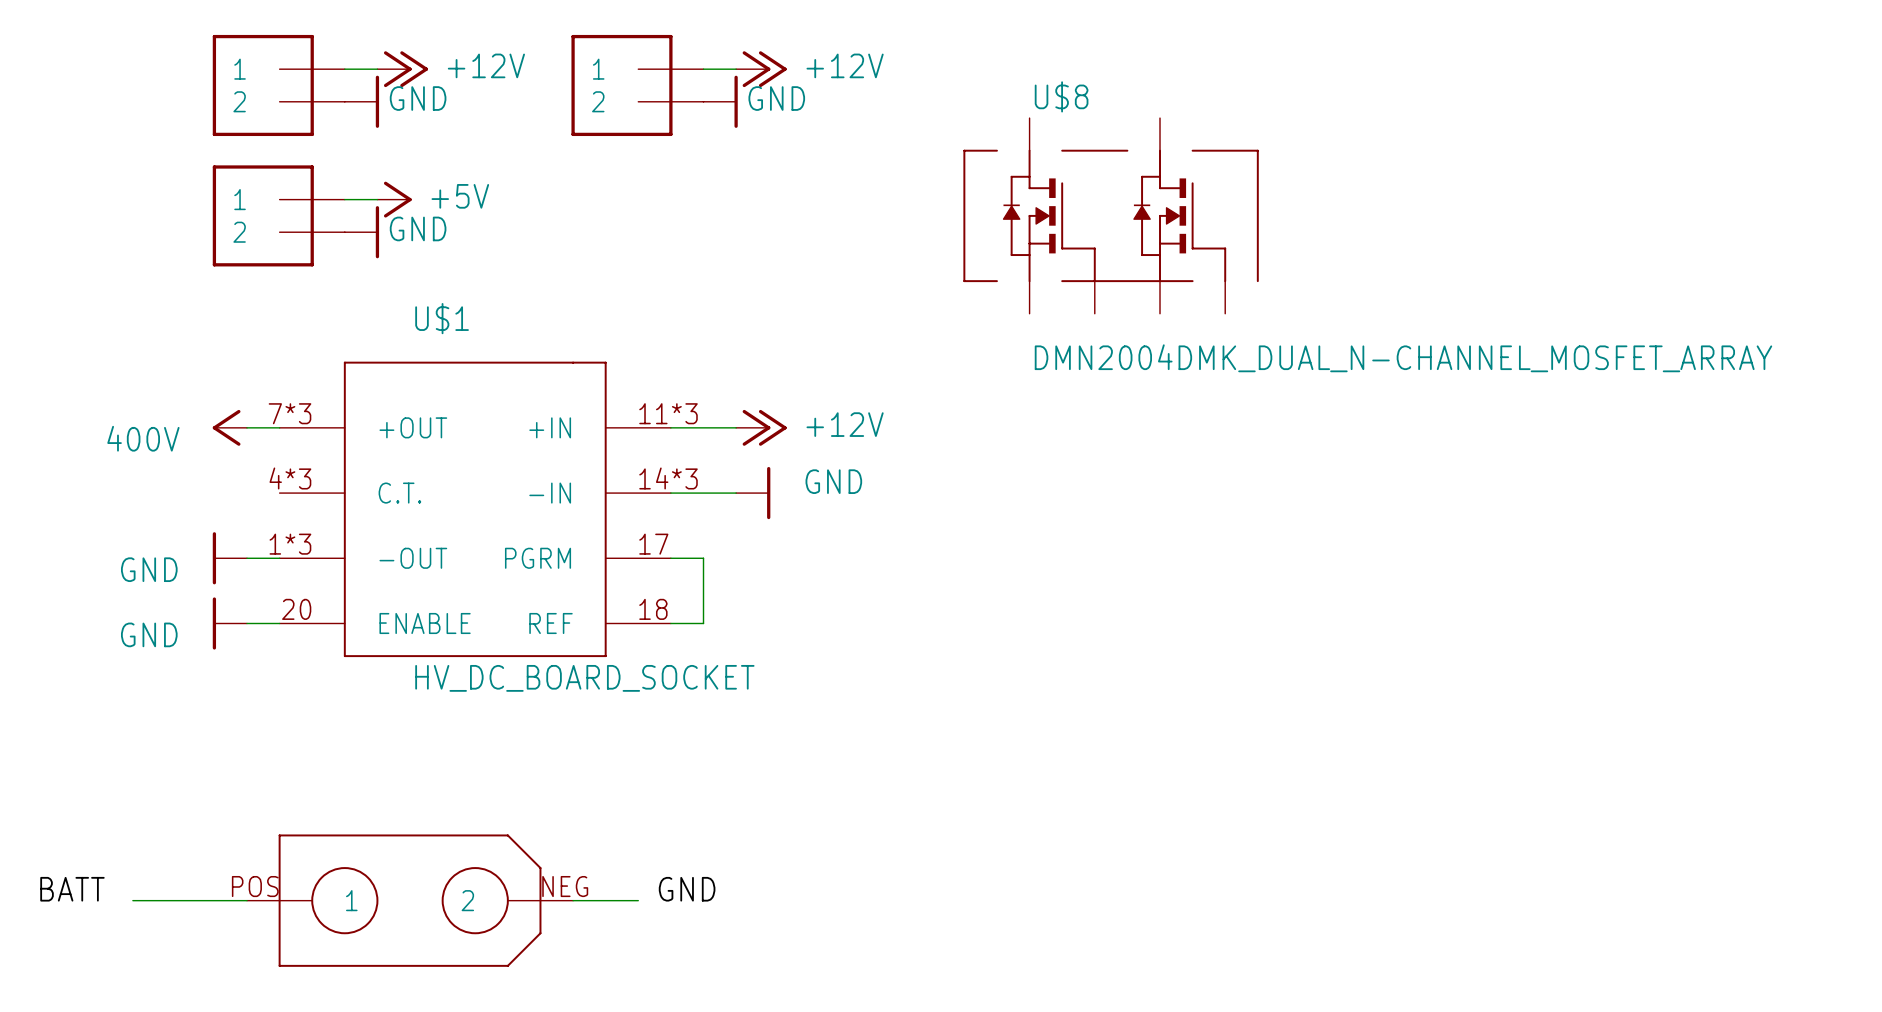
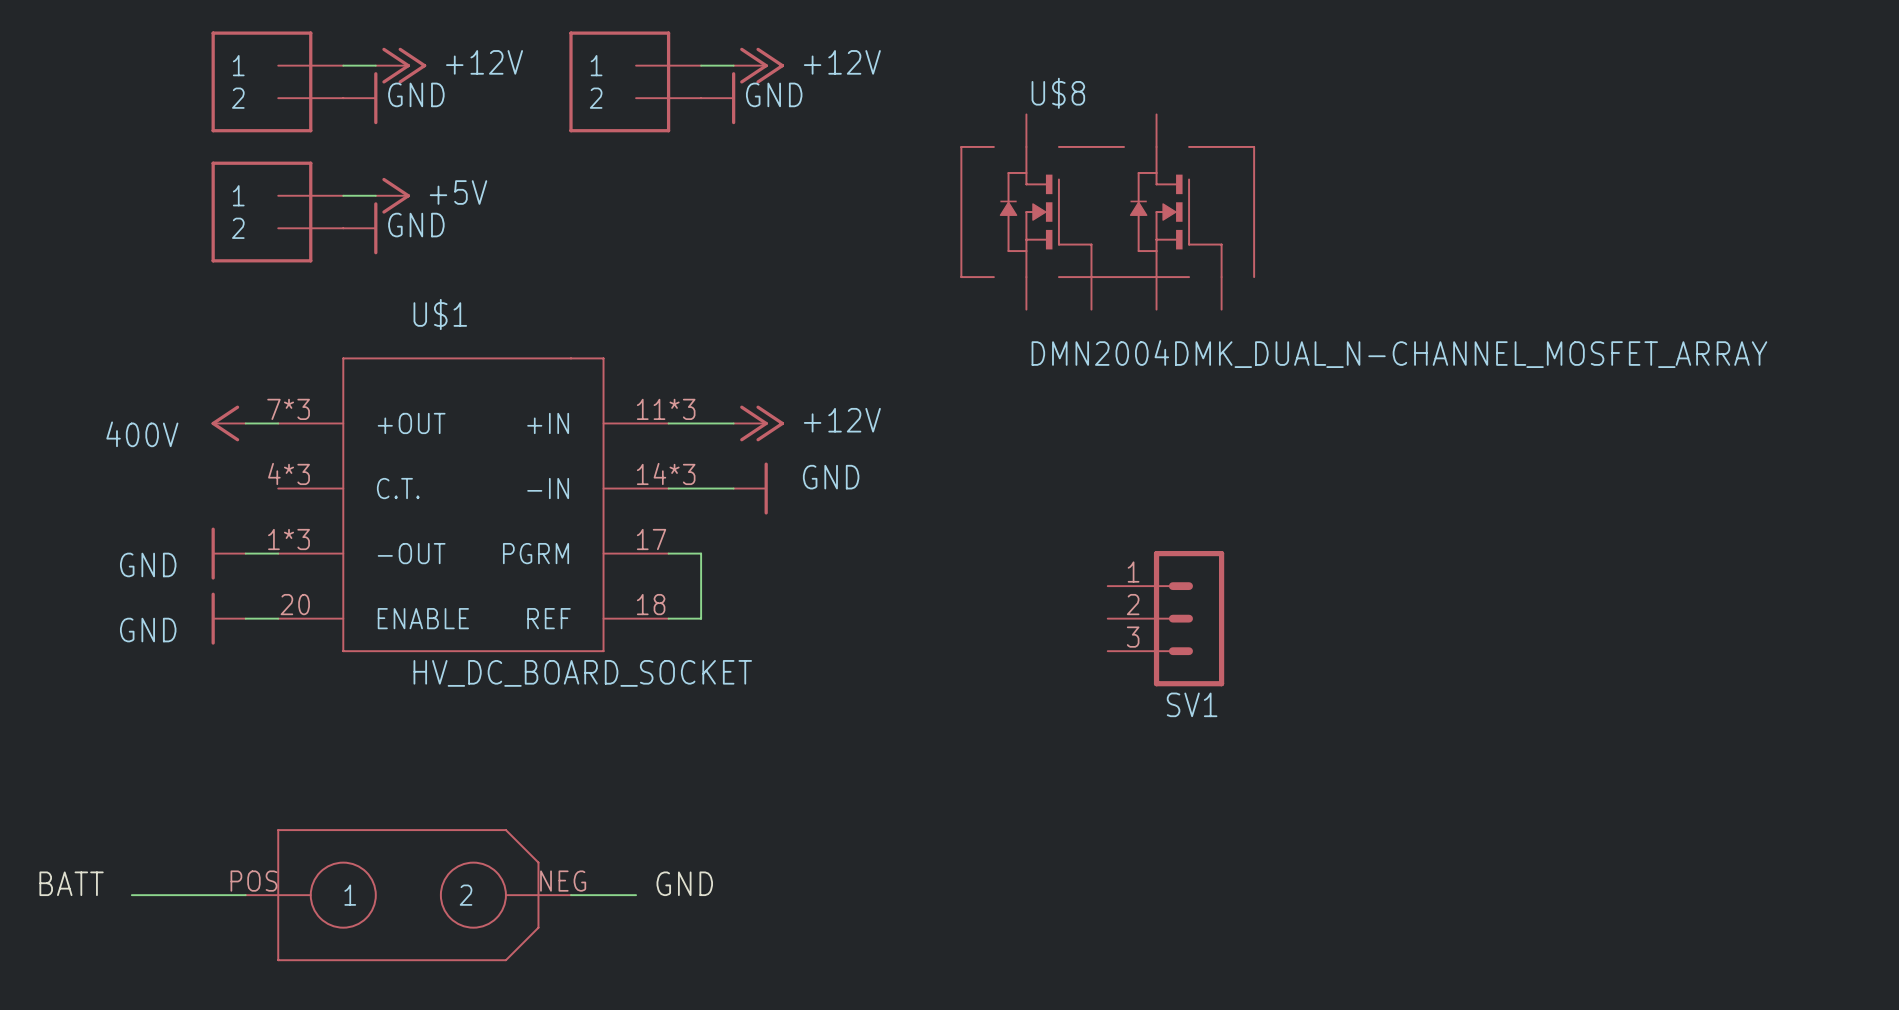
SV1: none -> (1165, 618)

